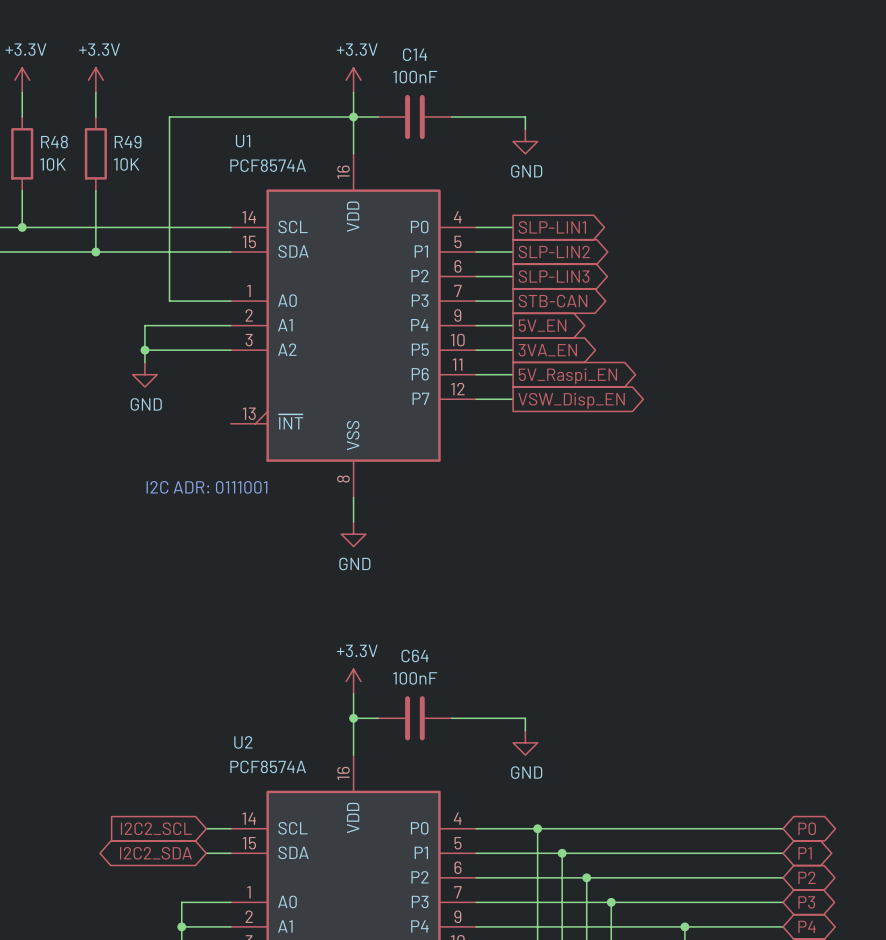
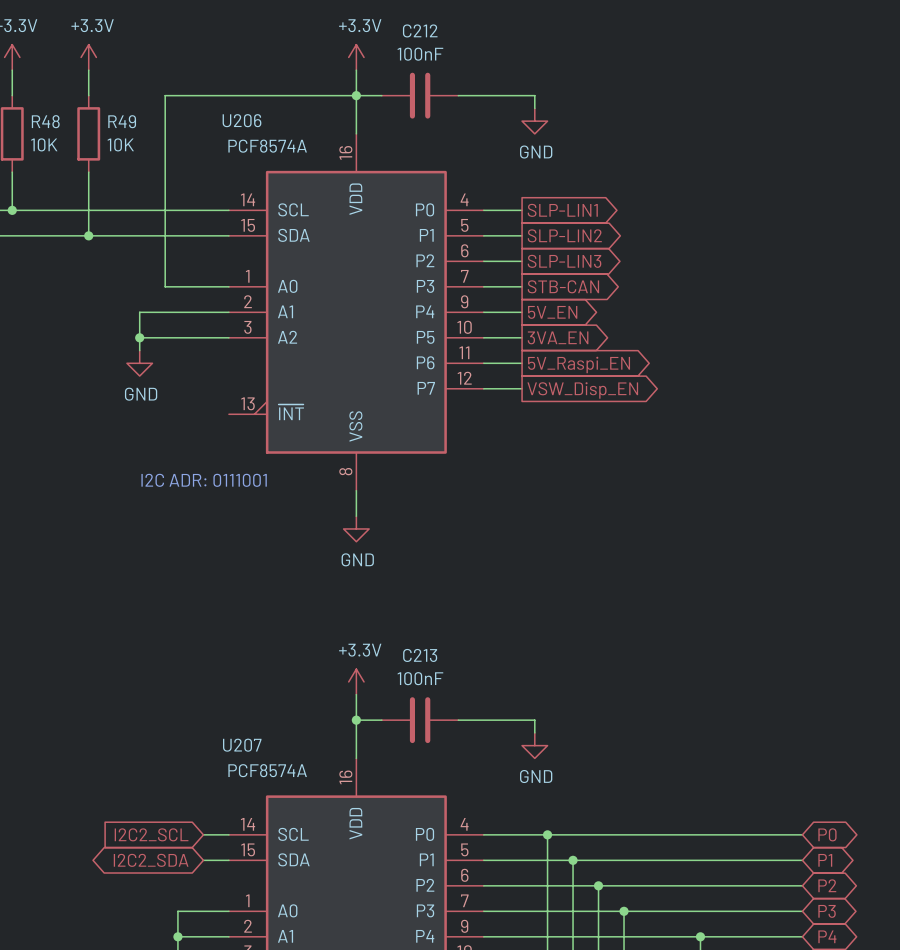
C14 name: C14 (415, 54) -> C212 (420, 30)
U1 name: U1 (243, 141) -> U206 (241, 120)
C64 name: C64 (415, 656) -> C213 (420, 655)
U2 name: U2 (243, 742) -> U207 (242, 745)

